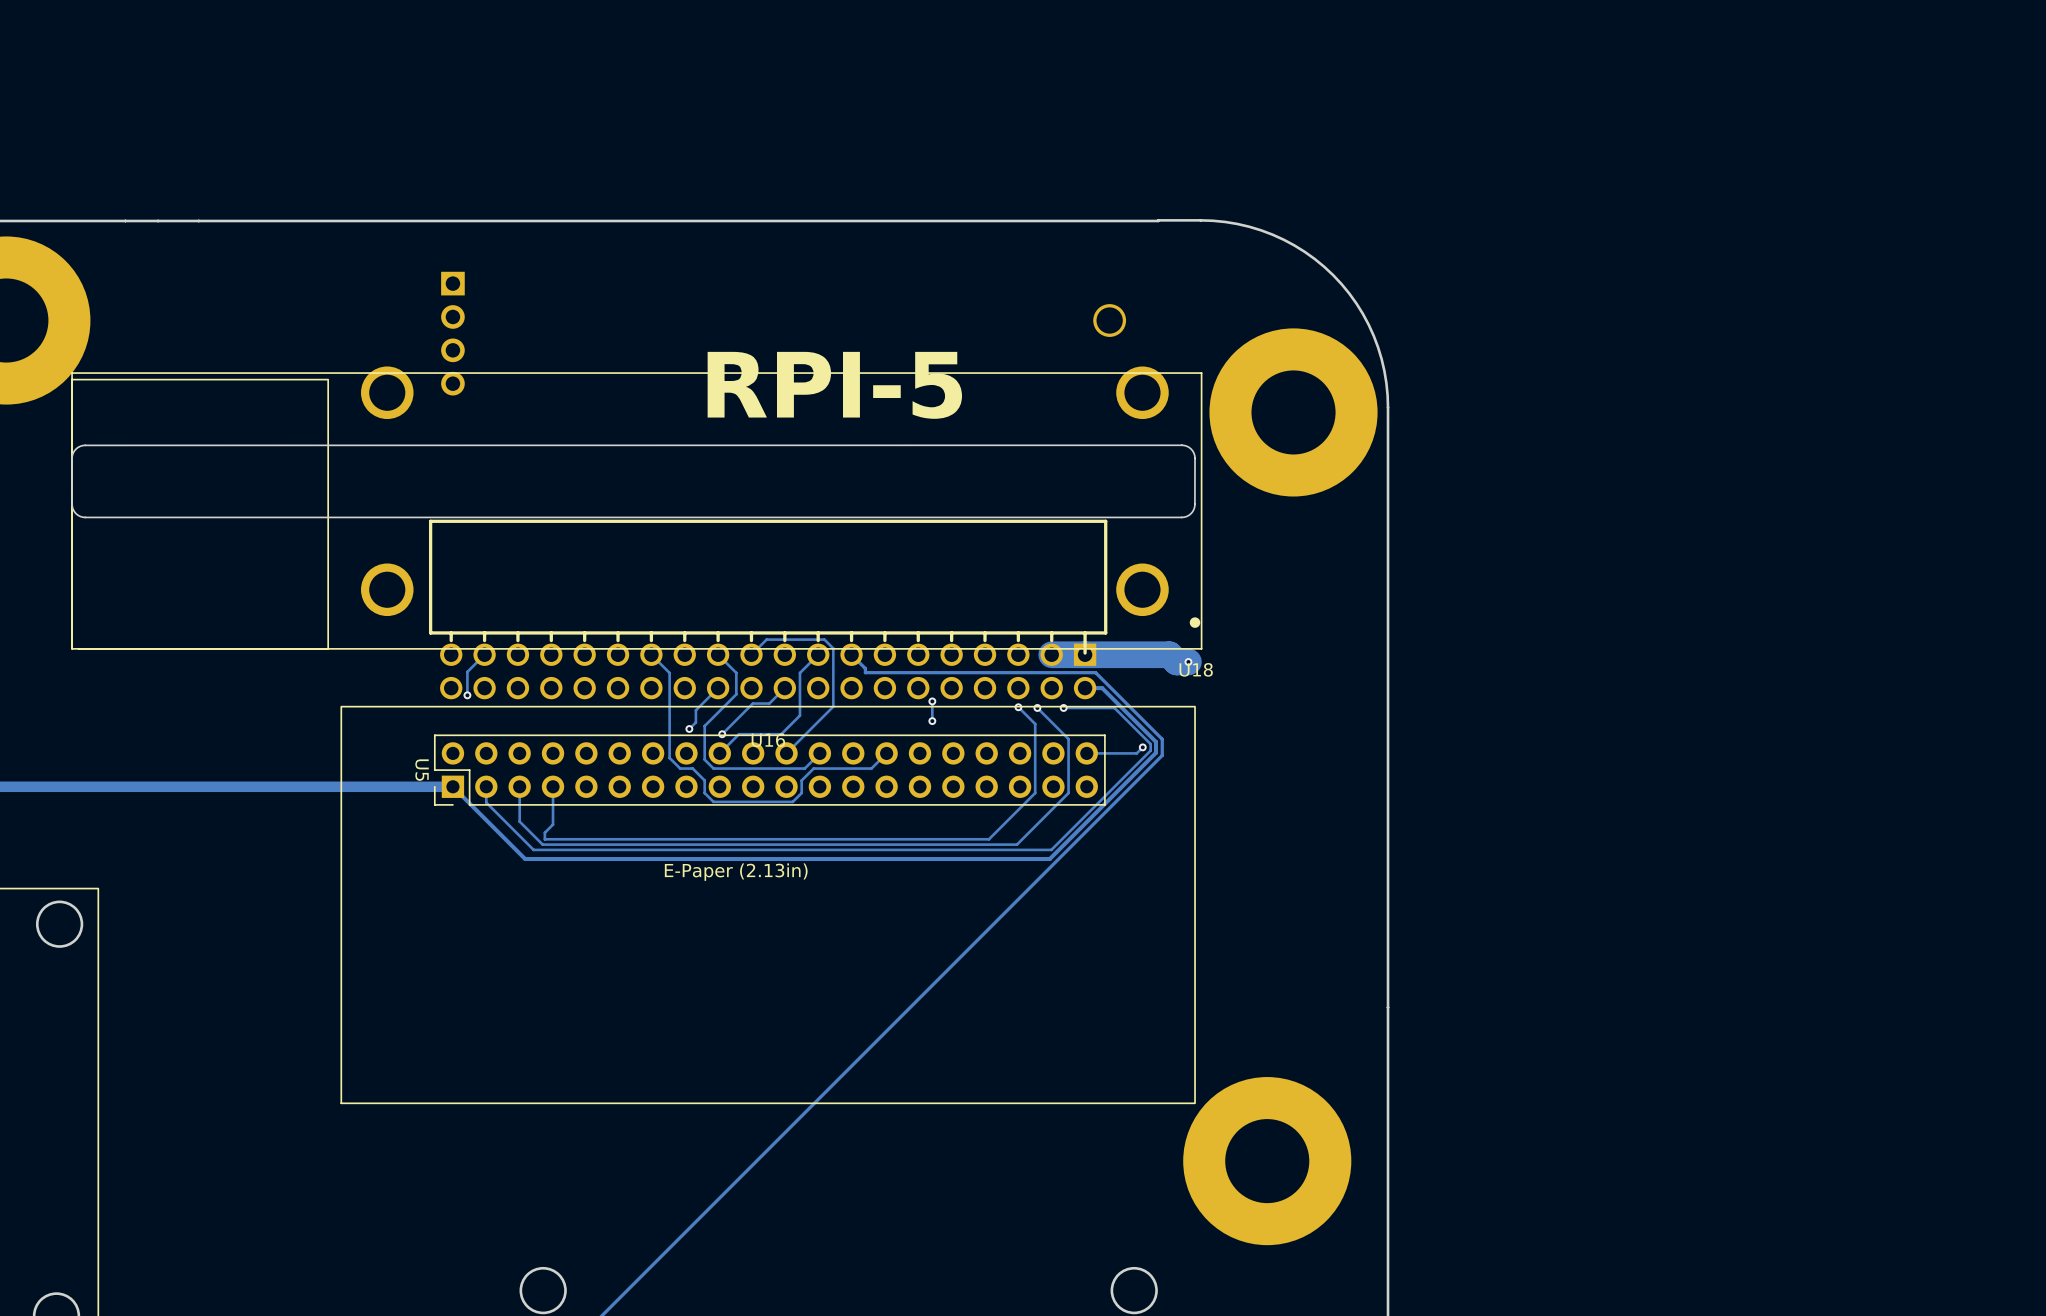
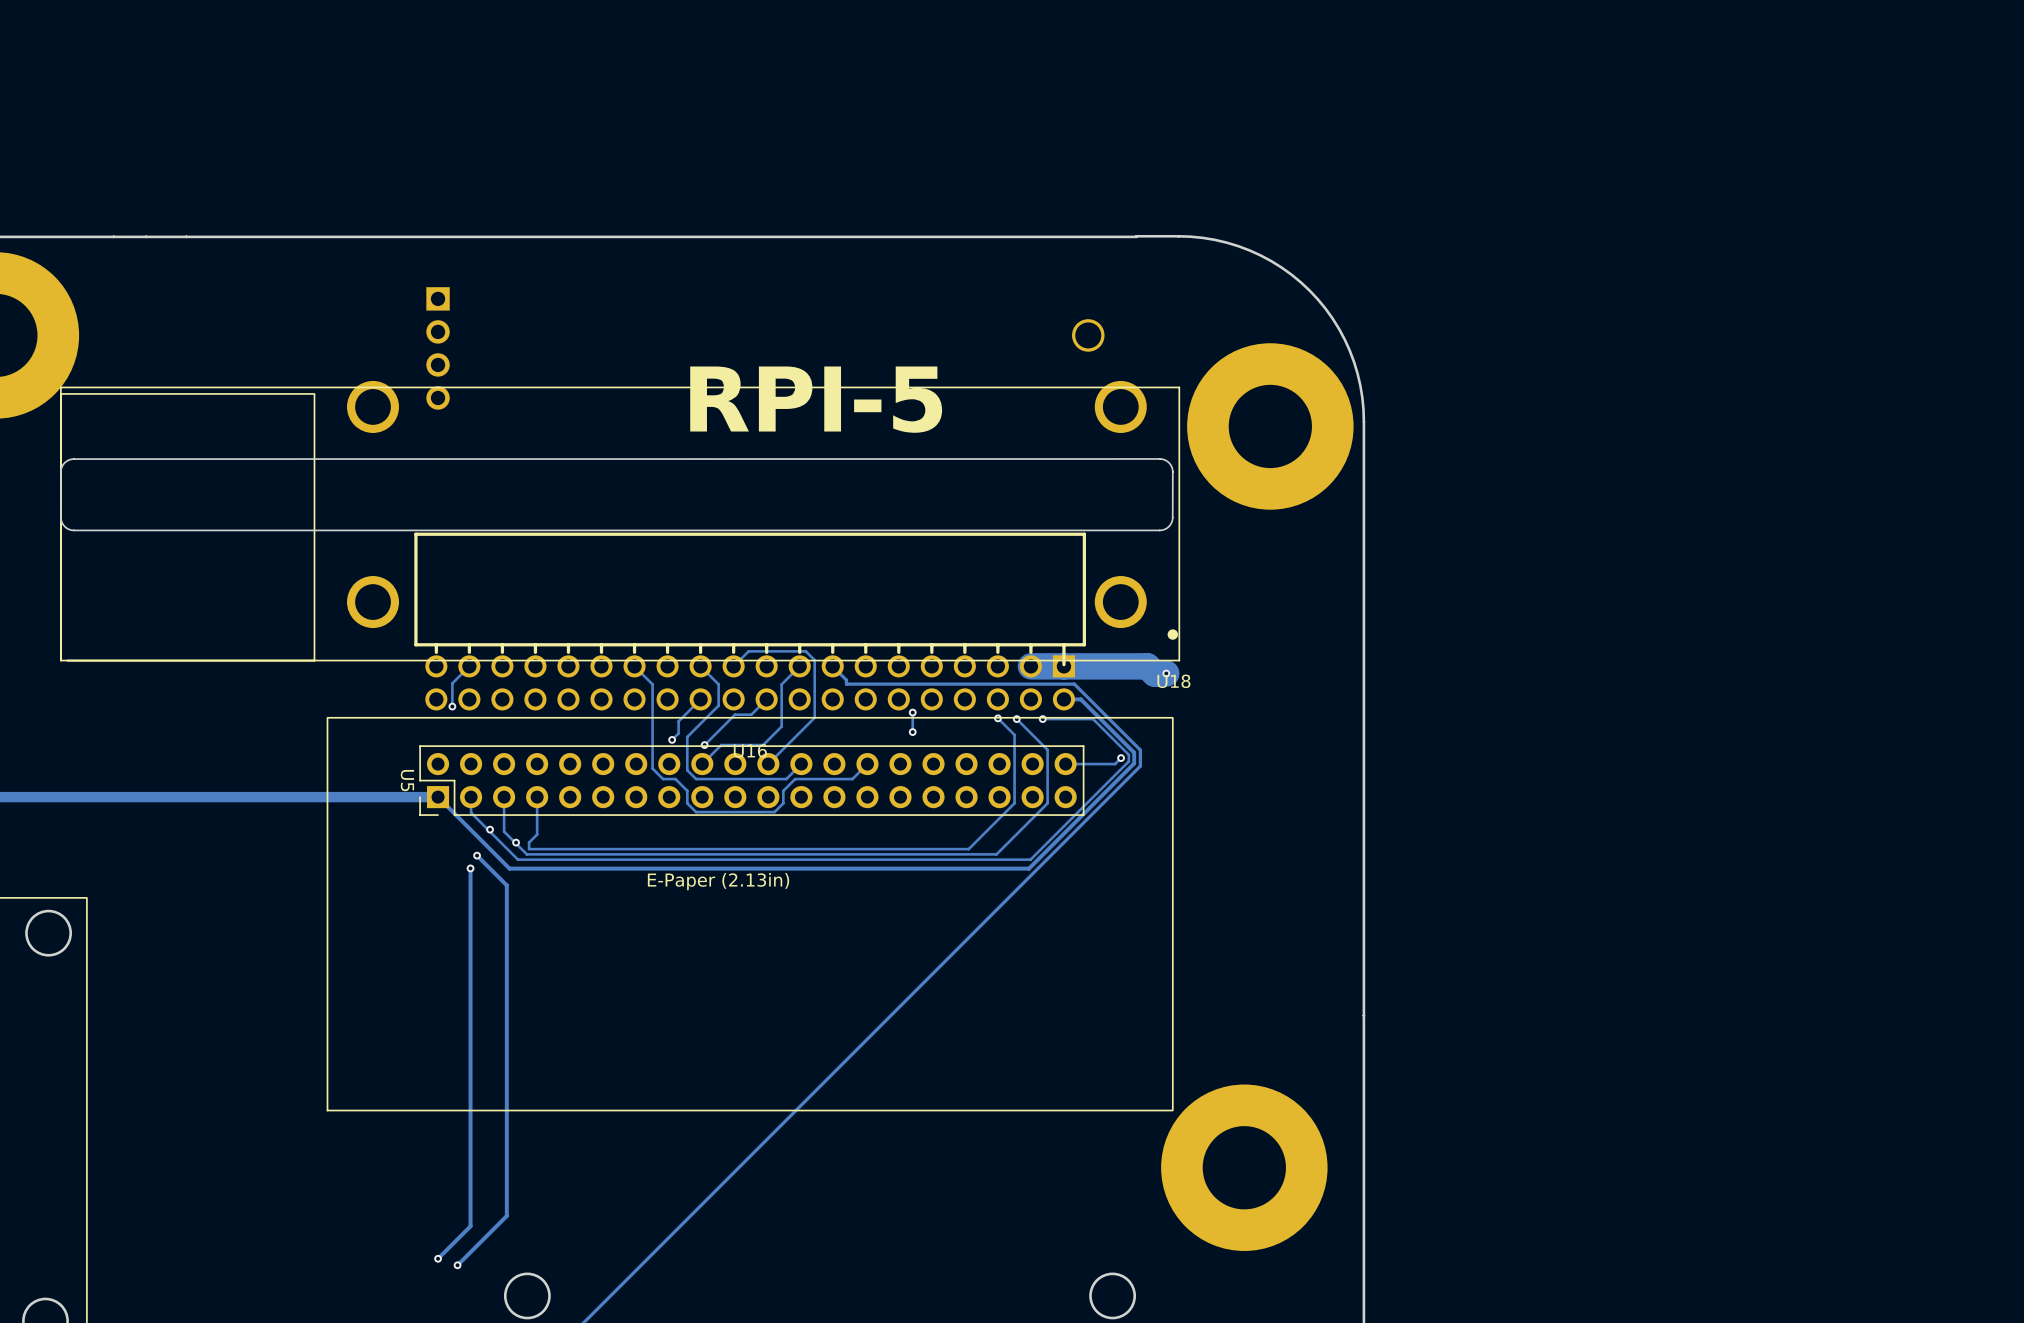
via: none -> (490, 829)
via: none -> (516, 842)
track: none -> (477, 855) (506, 885) (506, 1215) (457, 1265)
via: none -> (477, 855)
track: none -> (470, 868) (470, 1226) (438, 1258)
via: none -> (470, 868)
via: none -> (438, 1258)
via: none -> (457, 1265)

